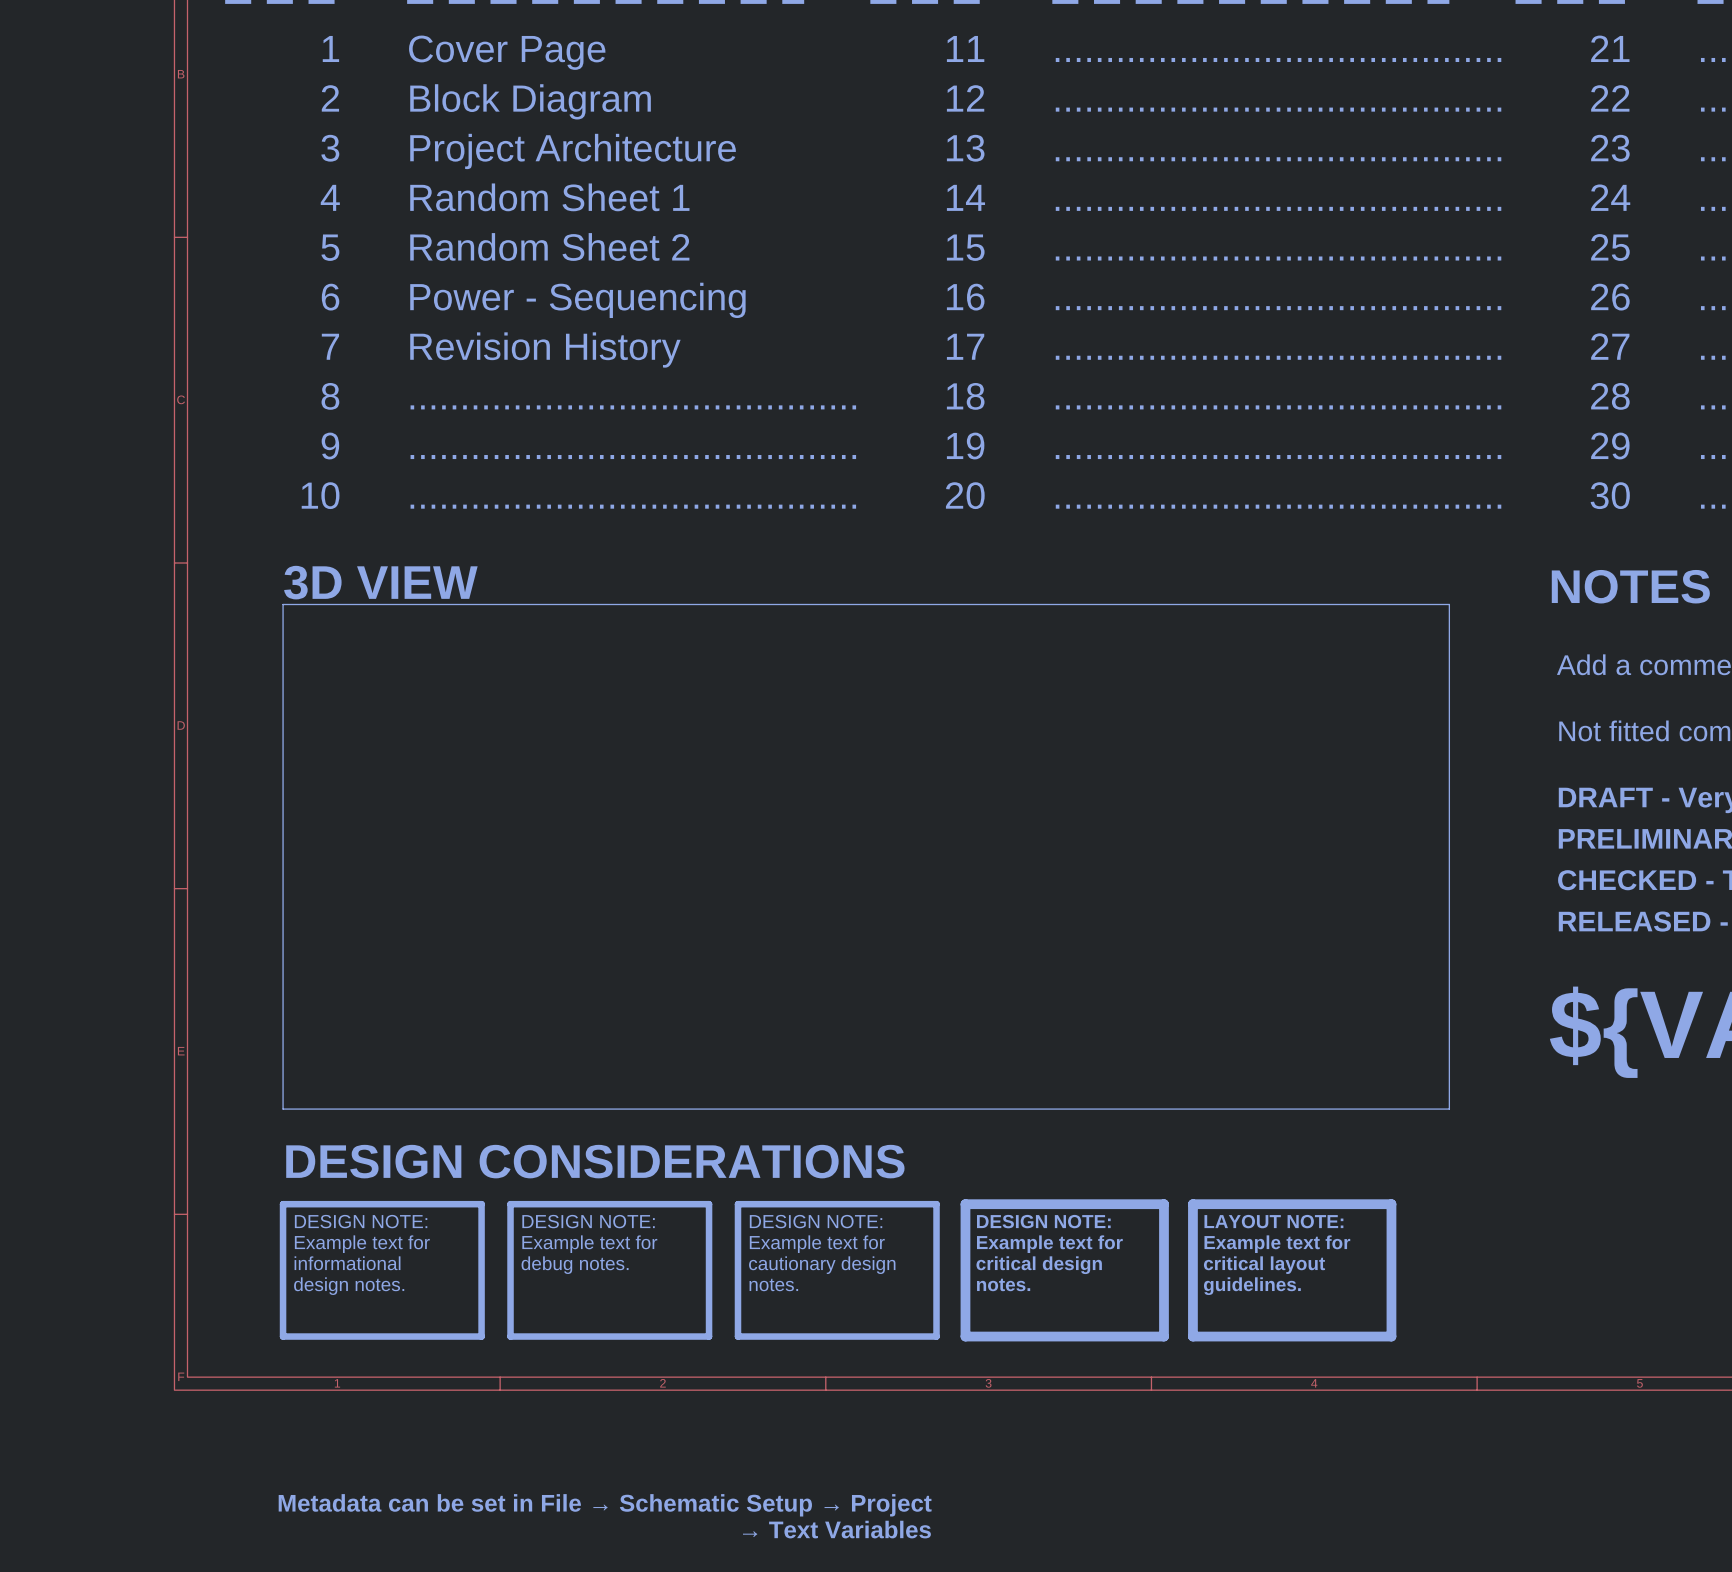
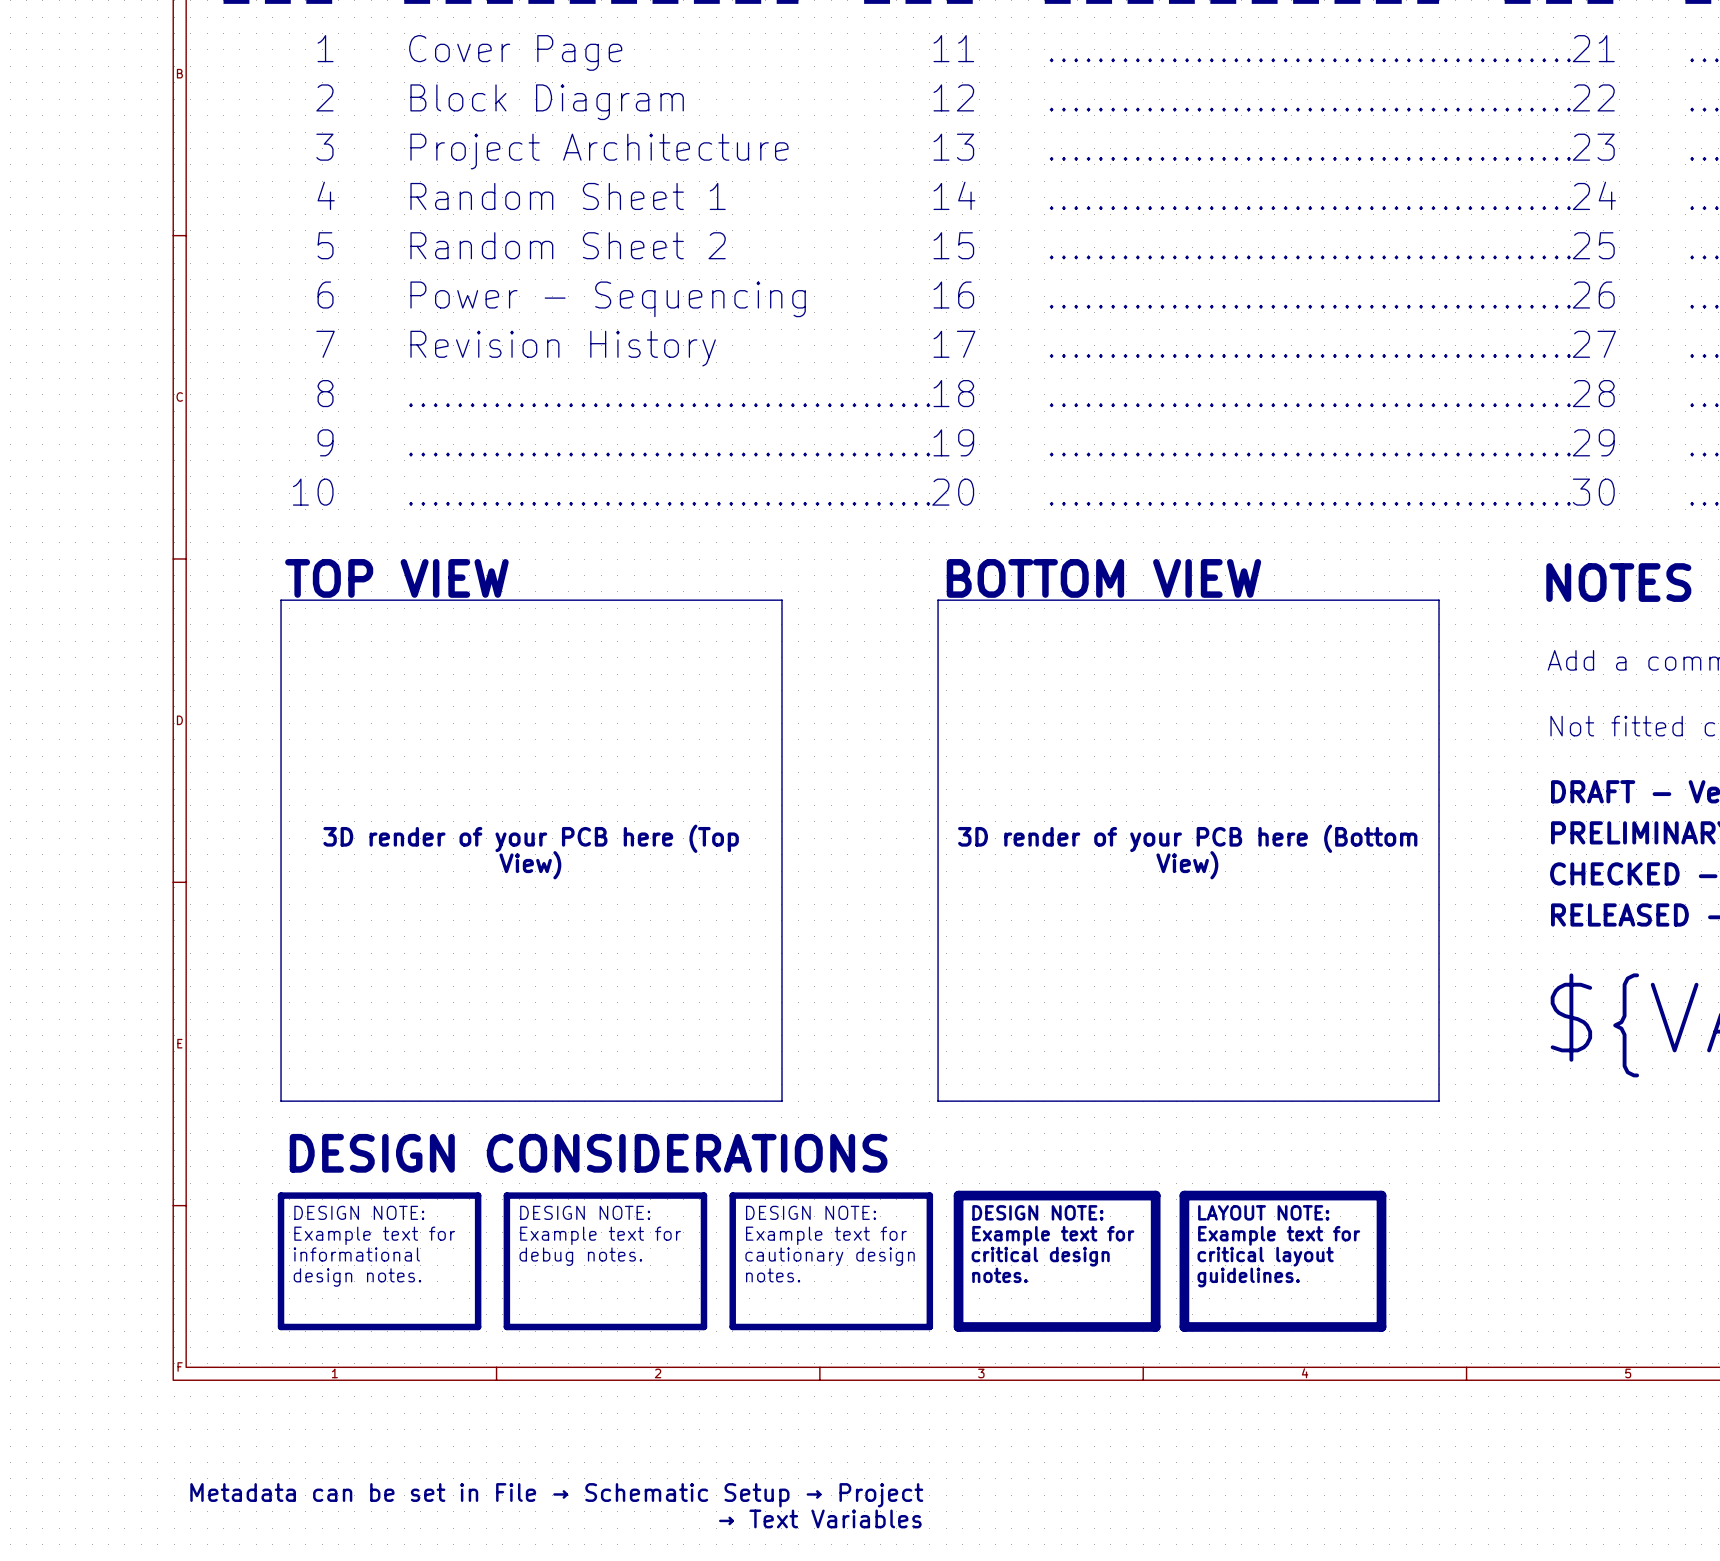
text: 3D VIEW (380, 582) -> TOP VIEW (396, 578)
text: none -> BOTTOM VIEW (1103, 578)
line: (787, 604) (944, 604) -> (781, 600) (781, 1101)
text: none -> 3D render of your PCB here (Top (531, 838)
text: none -> 3D render of your PCB here (Bottom (1187, 838)
text: none -> View) (530, 865)
text: none -> View) (1187, 865)
line: (787, 1109) (944, 1109) -> (938, 600) (938, 1101)

